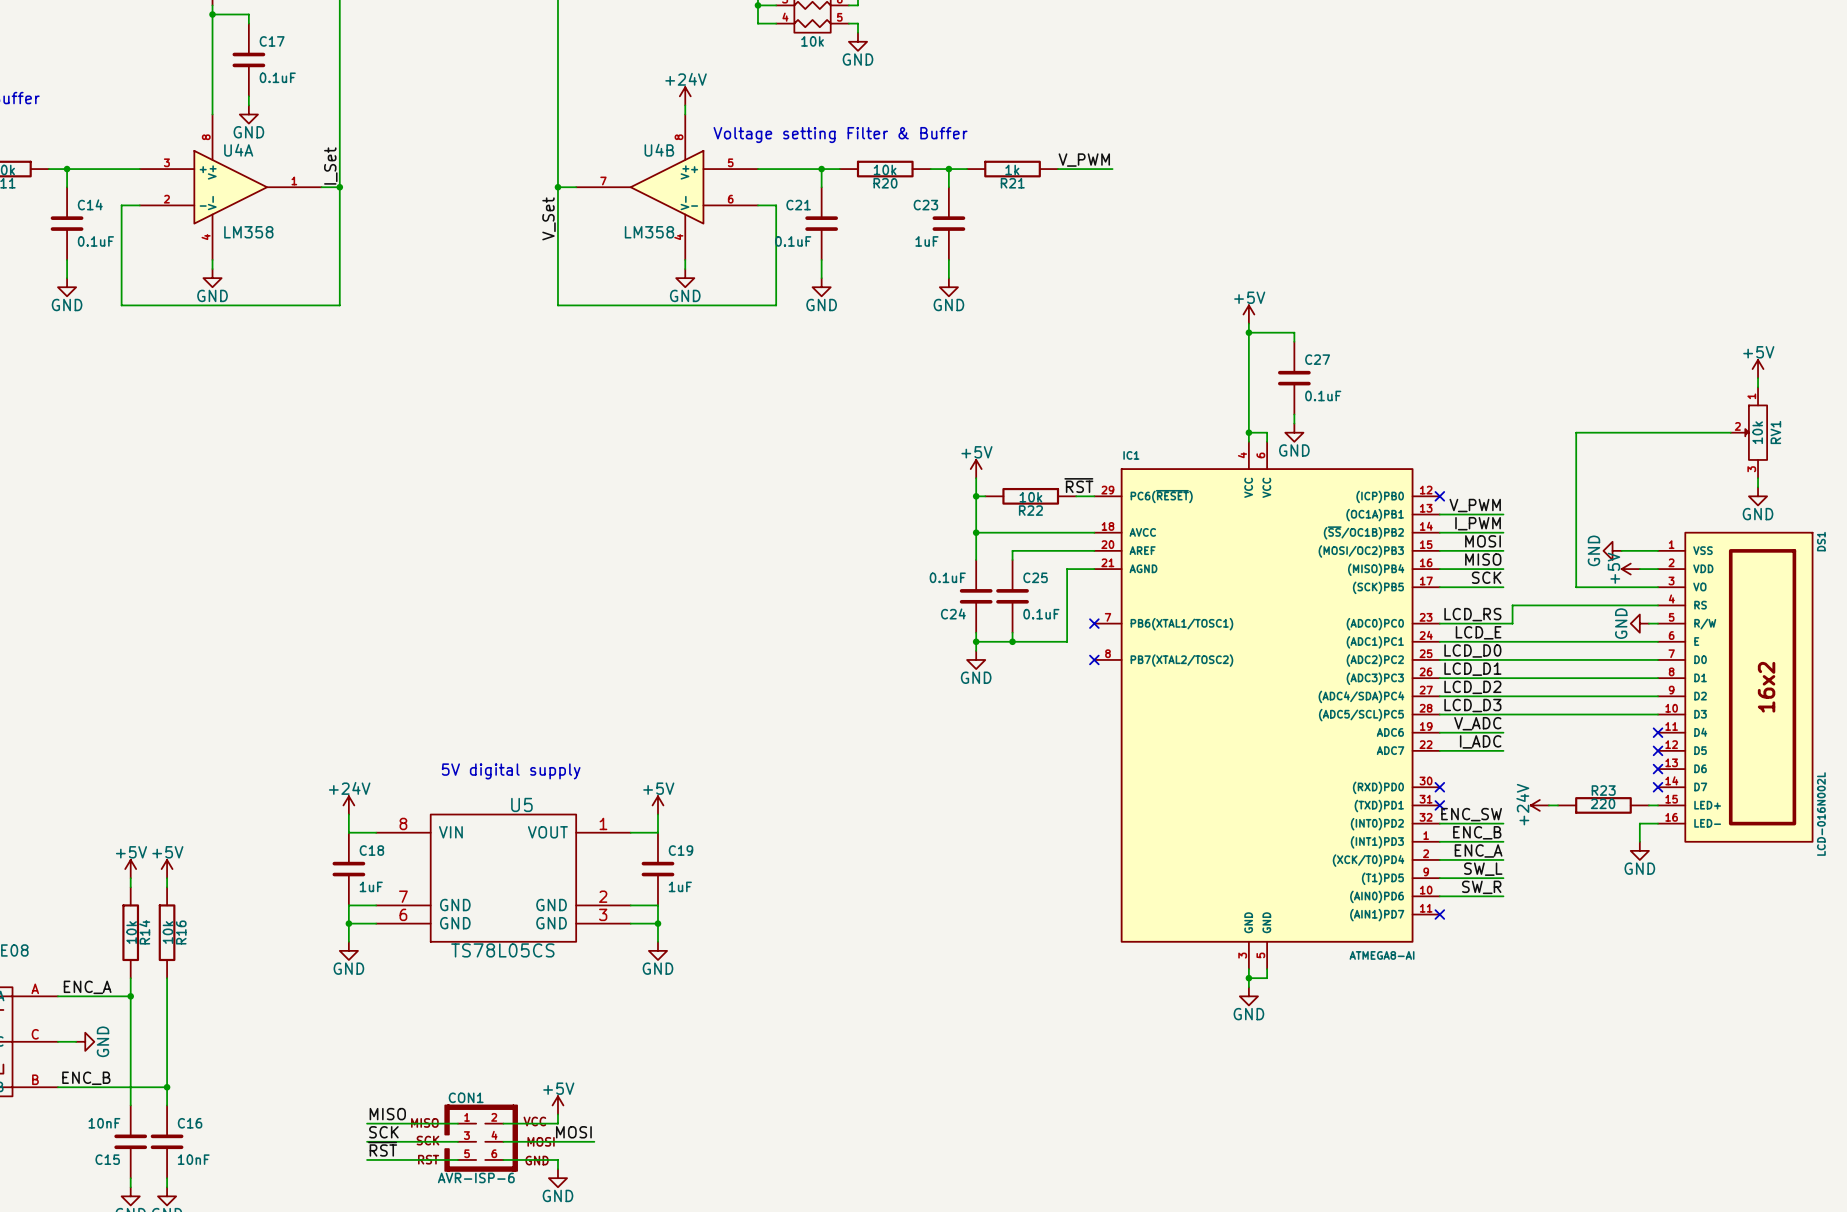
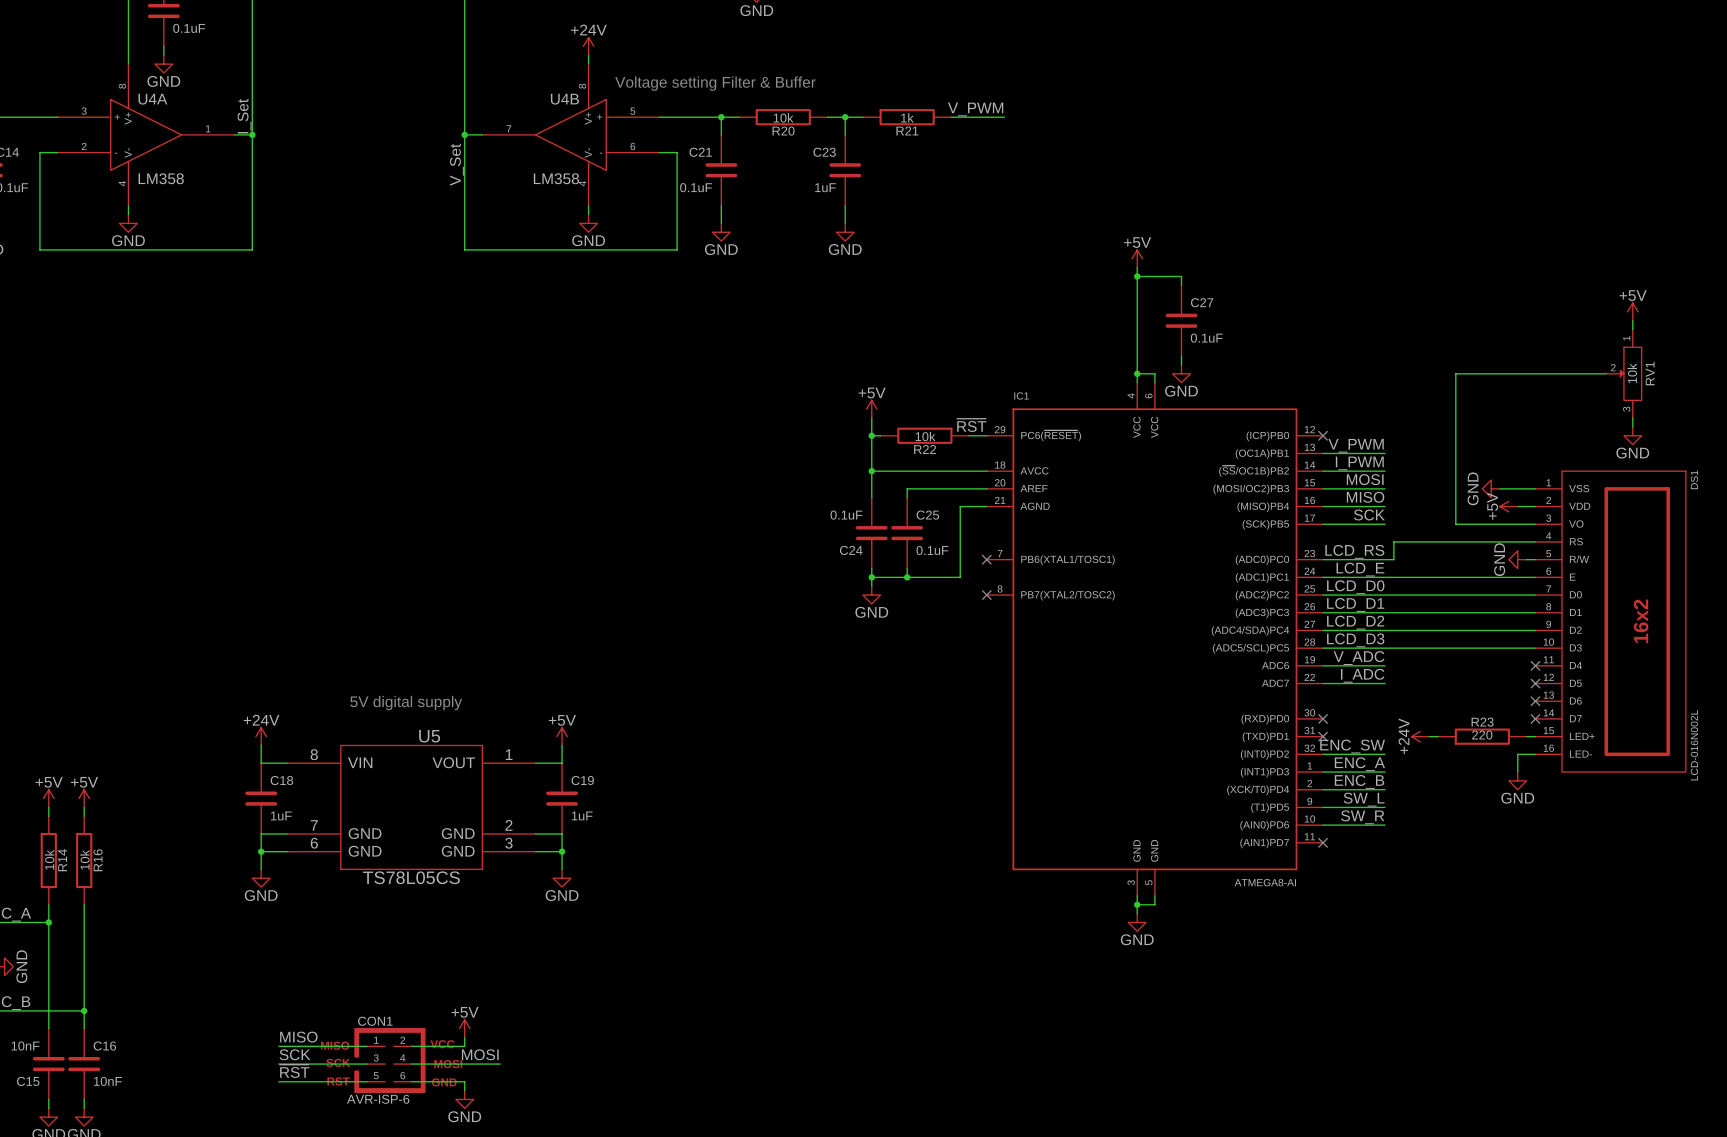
label: ENC_B (1477, 832) -> ENC_A (1359, 764)
label: ENC_A (1478, 850) -> ENC_B (1359, 781)

